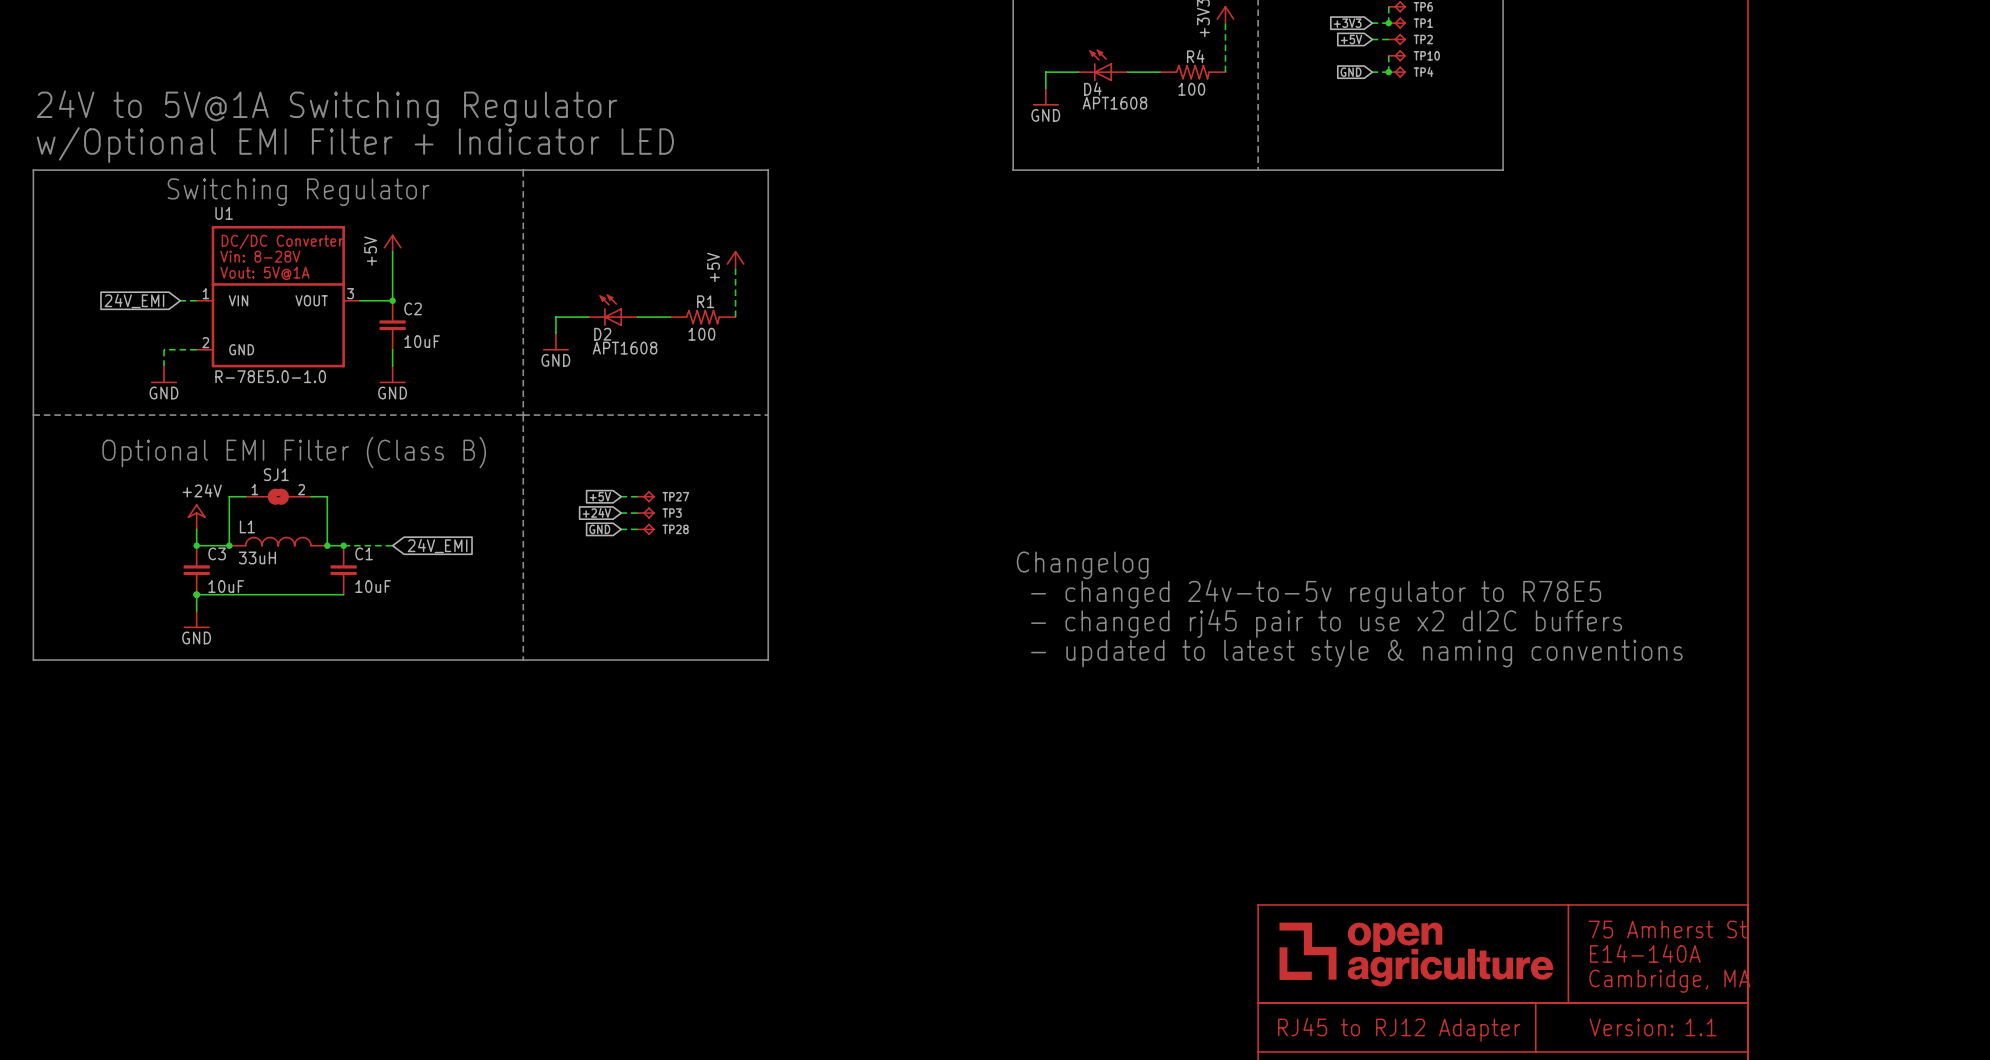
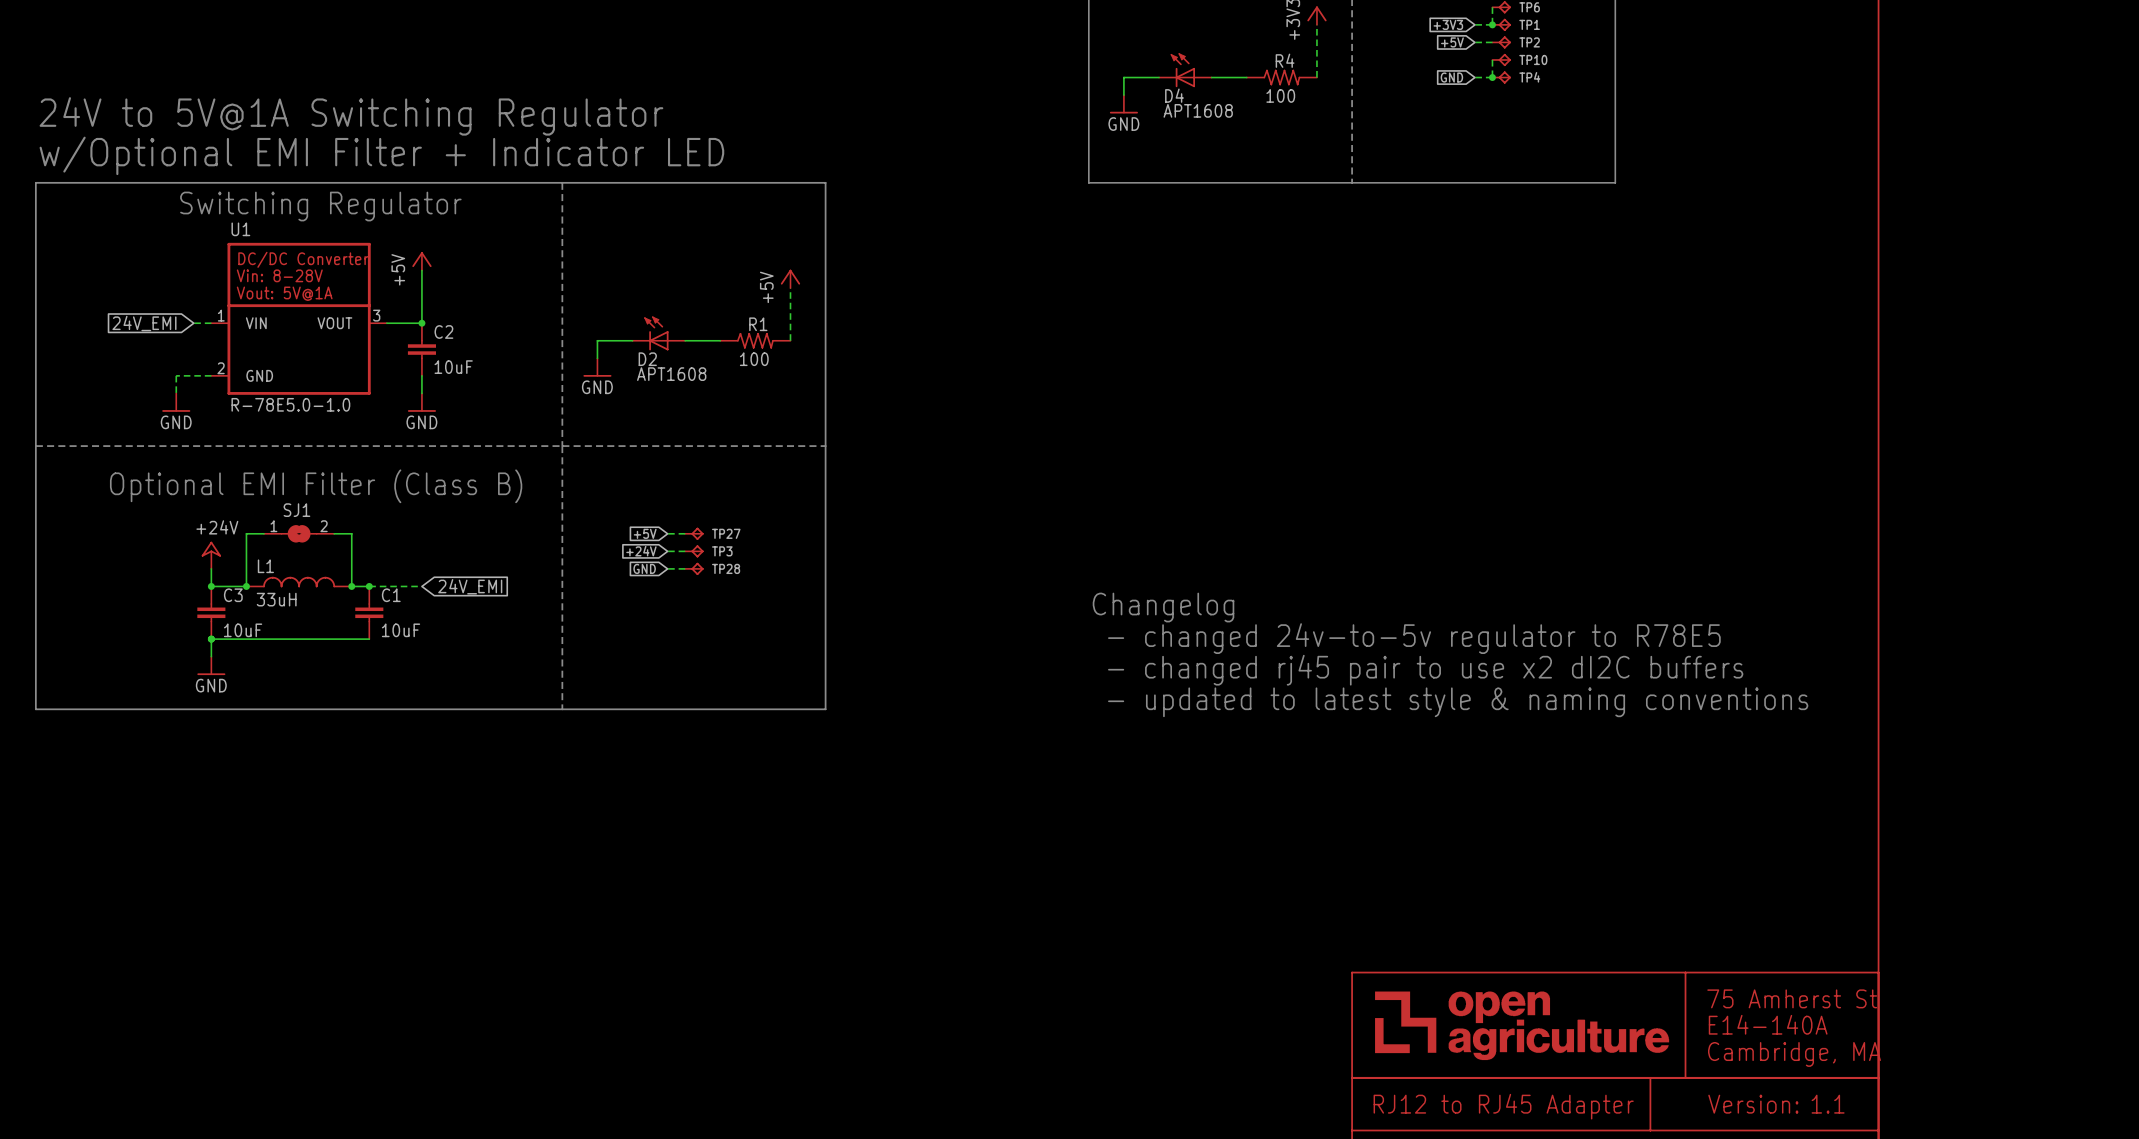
part text: RJ45 to RJ12 Adapter (1399, 1029) -> RJ12 to RJ45 Adapter (1503, 1106)

